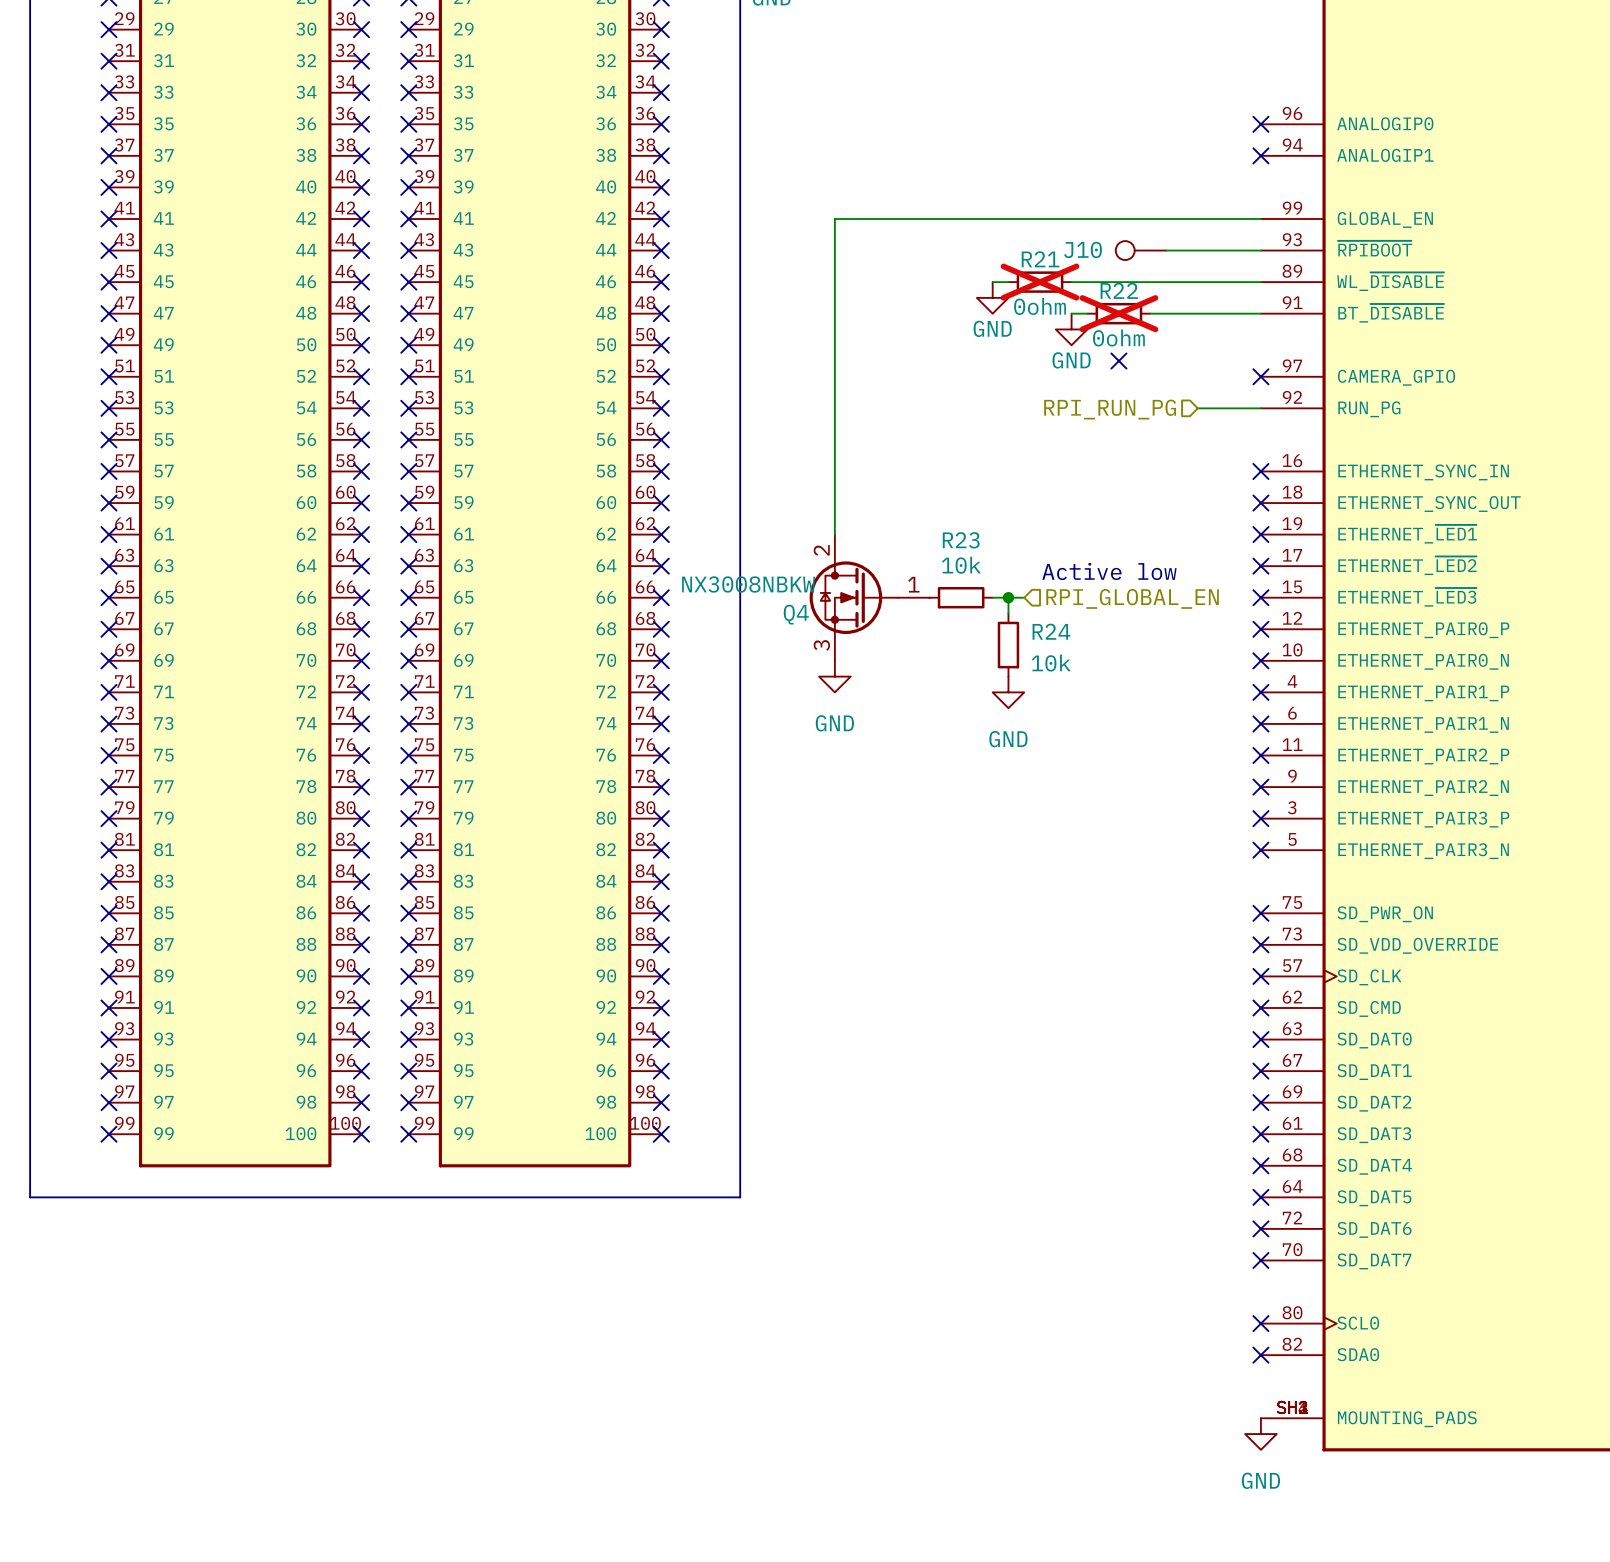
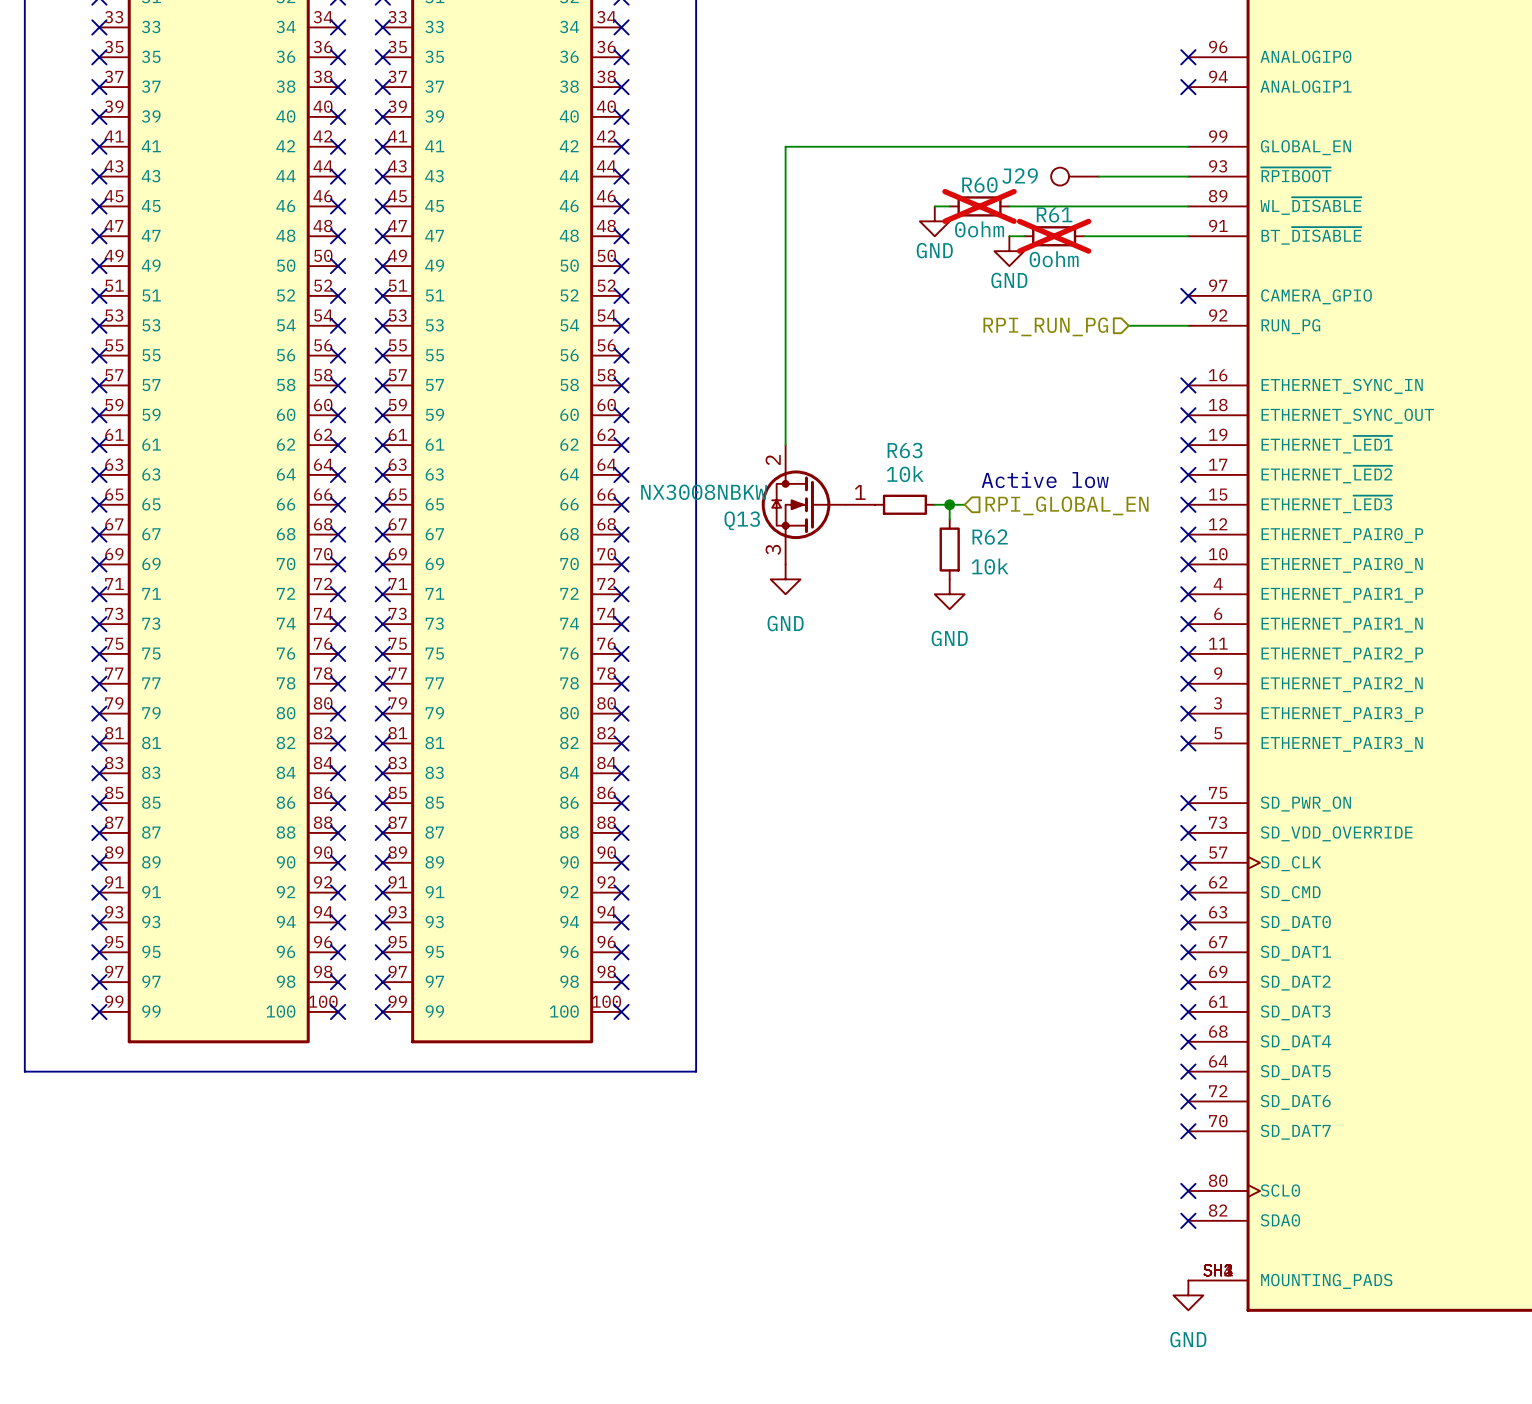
J10 name: J10 (1083, 249) -> J29 (1020, 176)
R21 name: R21 (1040, 259) -> R60 (979, 184)
R22 name: R22 (1119, 290) -> R61 (1054, 214)
no-connect mark: (1118, 361) -> none
R23 name: R23 (961, 540) -> R63 (905, 450)
Q4 name: Q4 (796, 614) -> Q13 (742, 520)
R24 name: R24 (1051, 631) -> R62 (990, 537)

